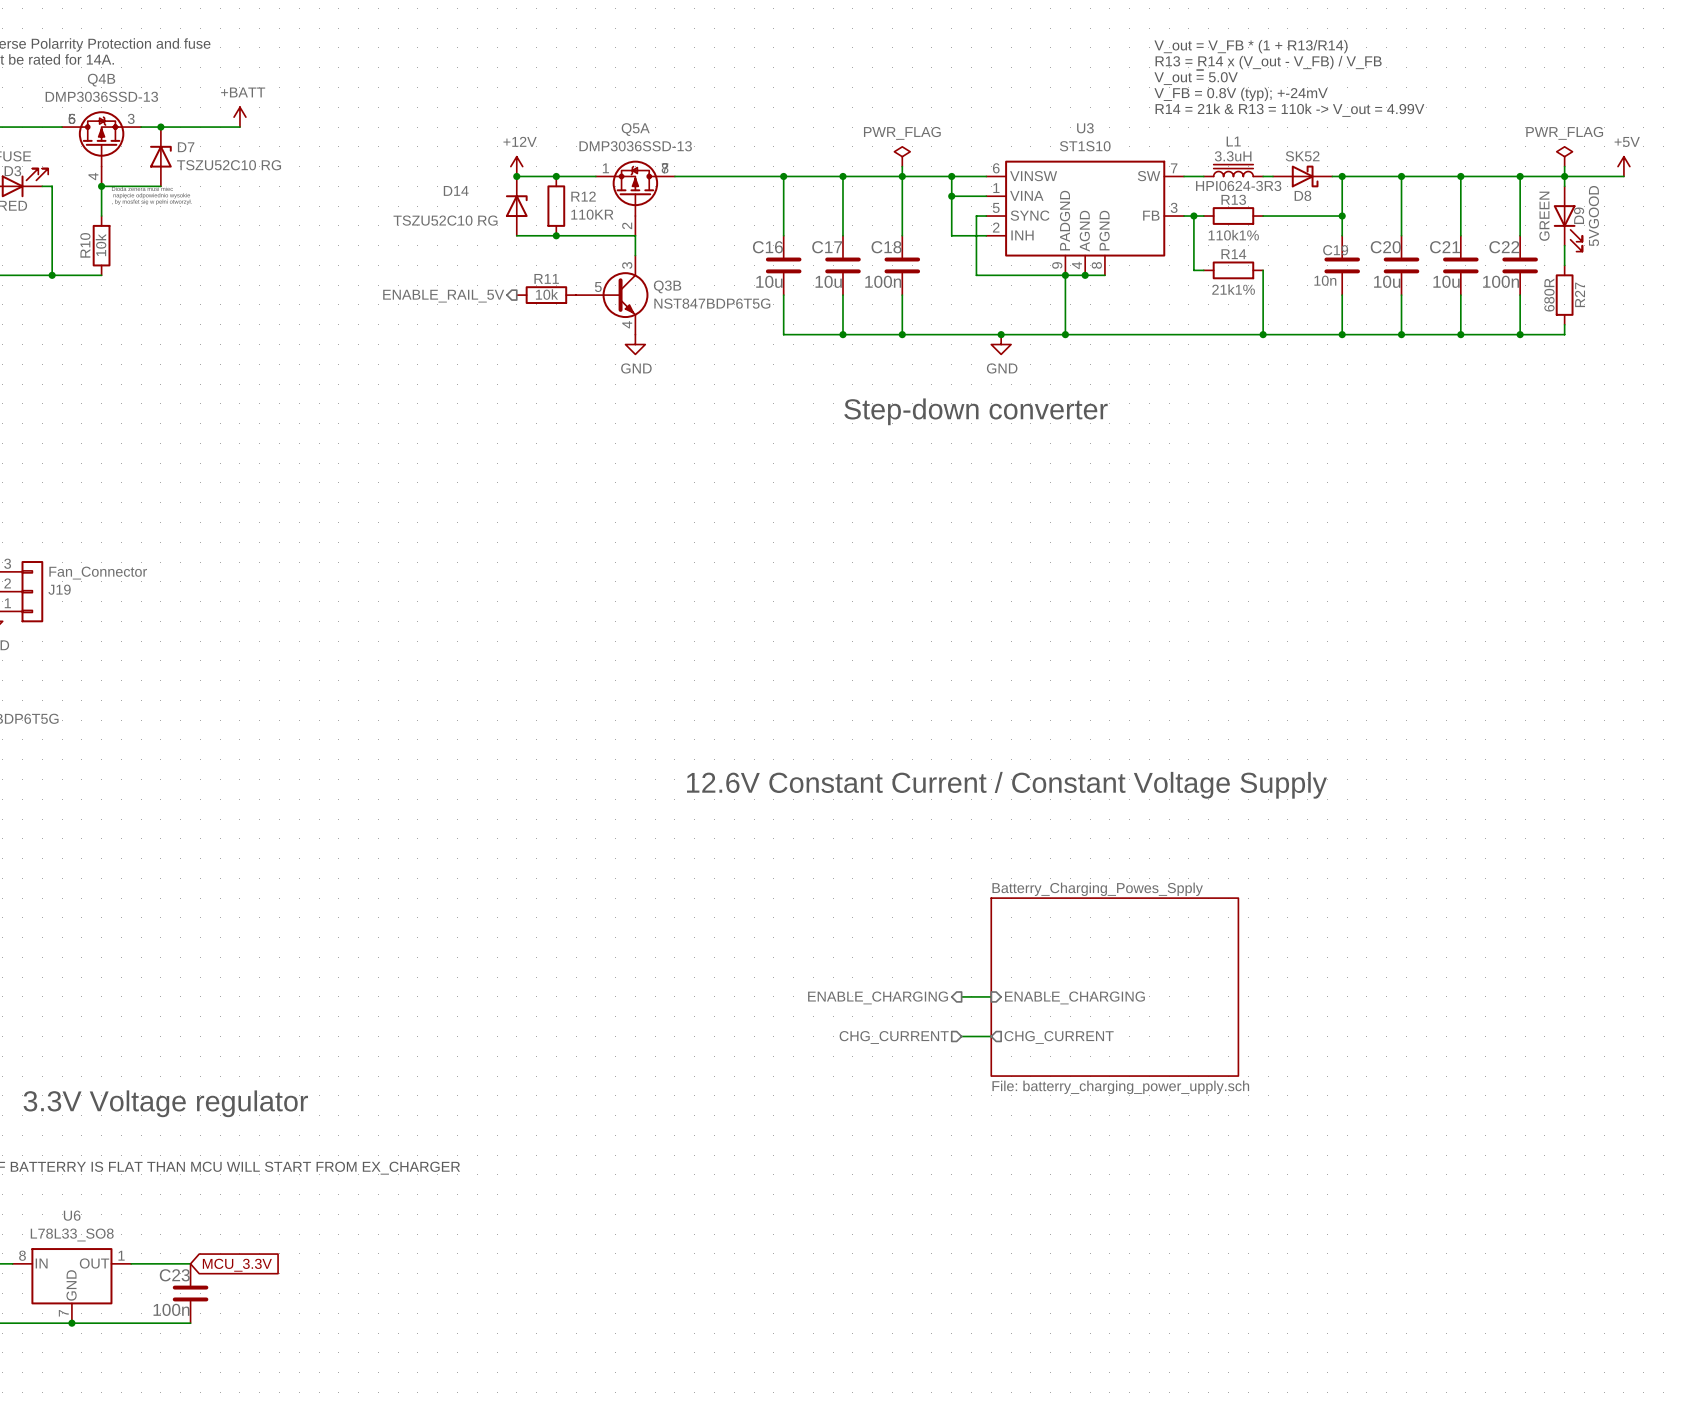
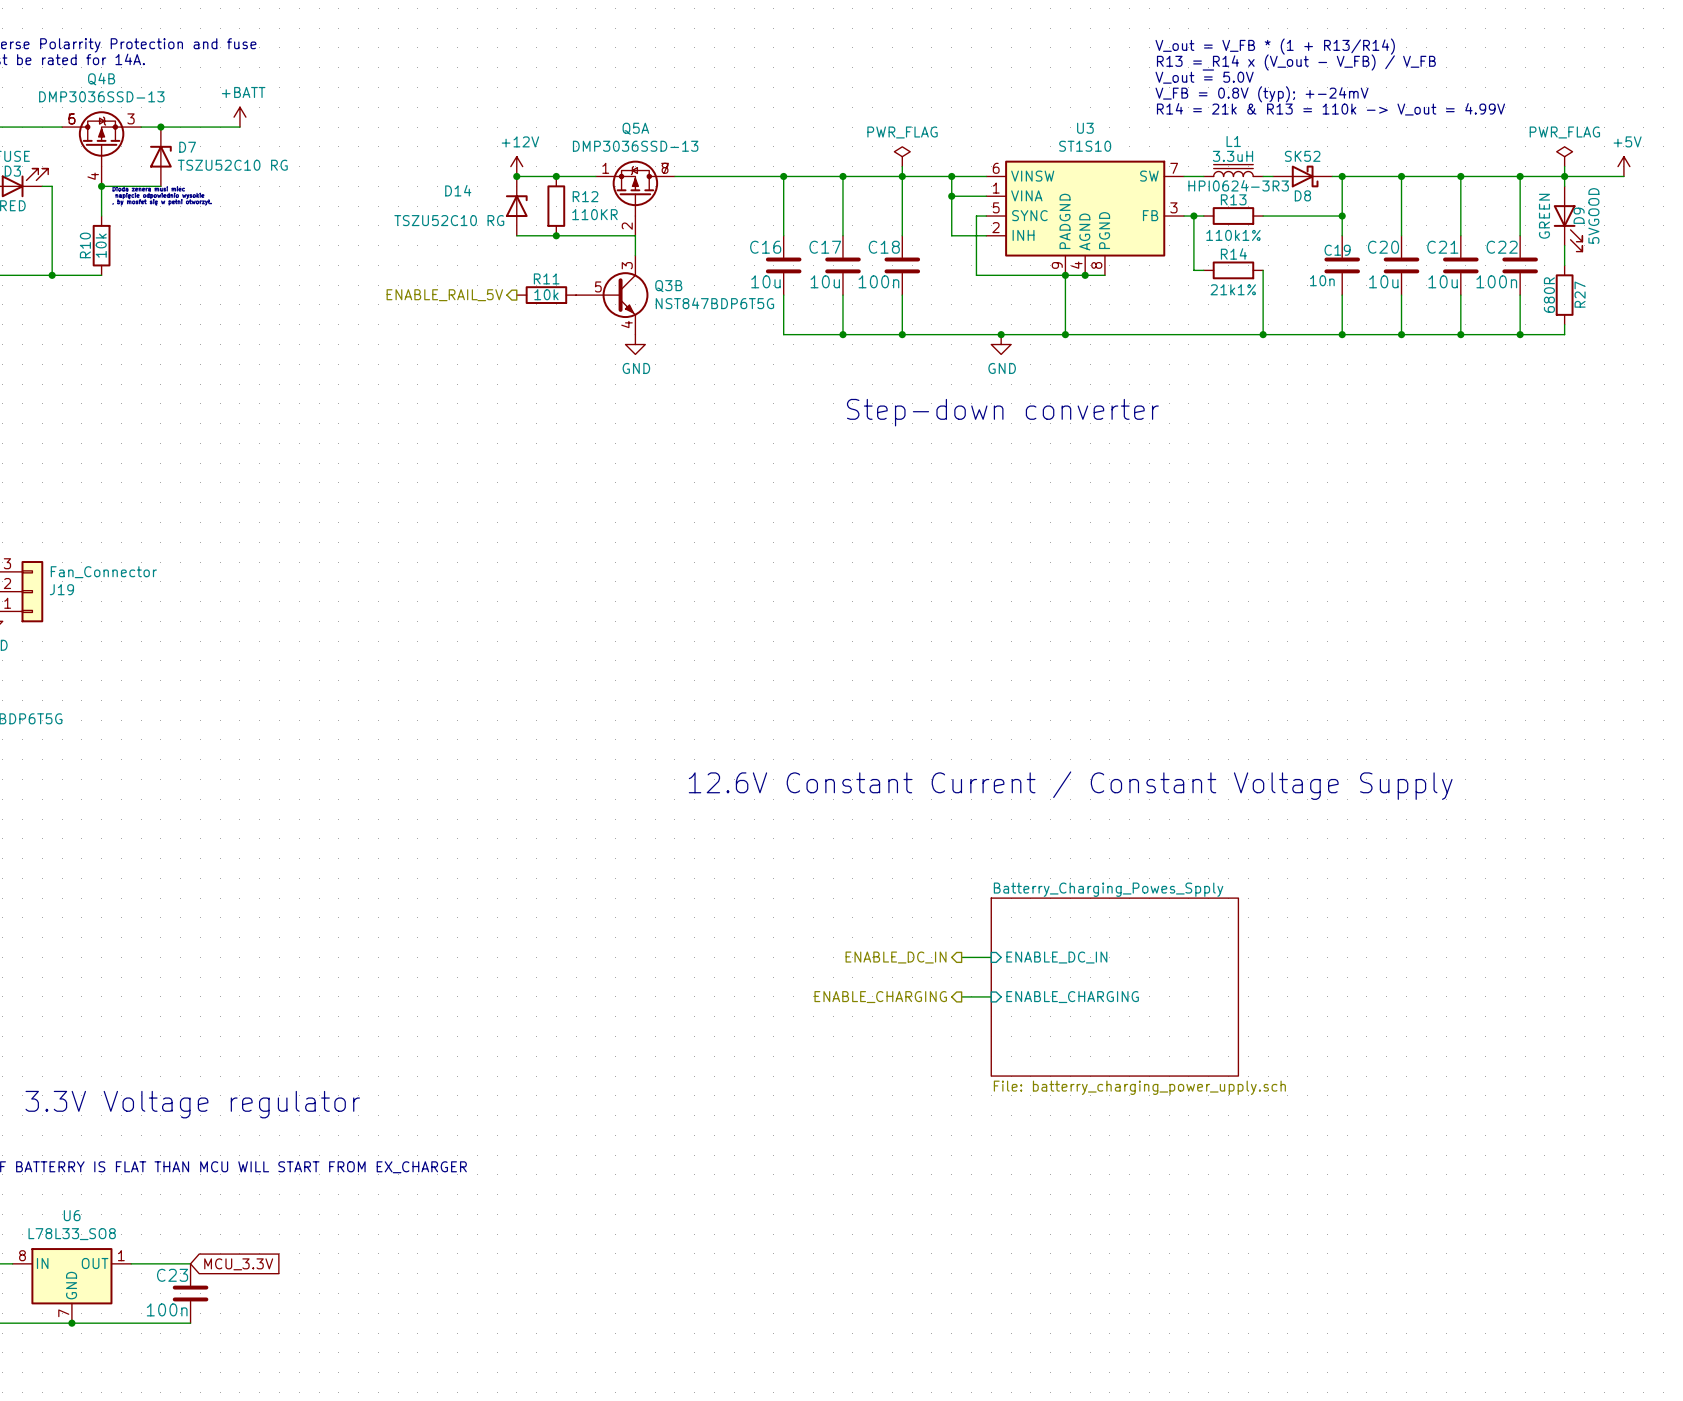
hierarchical label: none -> ENABLE_DC_IN (896, 957)
sheet pin: none -> ENABLE_DC_IN (1056, 957)
wire: (961, 1036) (991, 1036) -> (961, 957) (991, 957)
hierarchical label: CHG_CURRENT (894, 1037) -> none
sheet pin: CHG_CURRENT (1059, 1037) -> none

